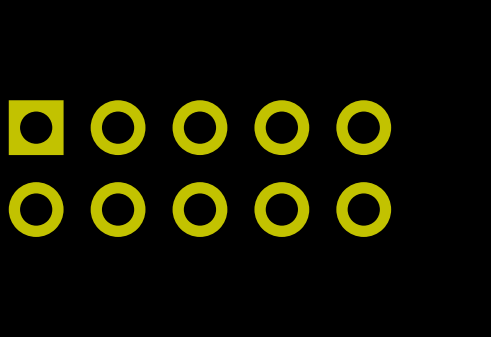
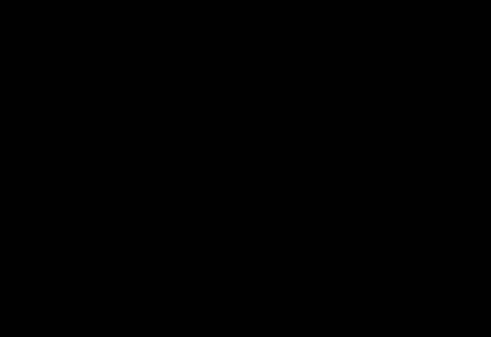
part: (199, 168) -> none

